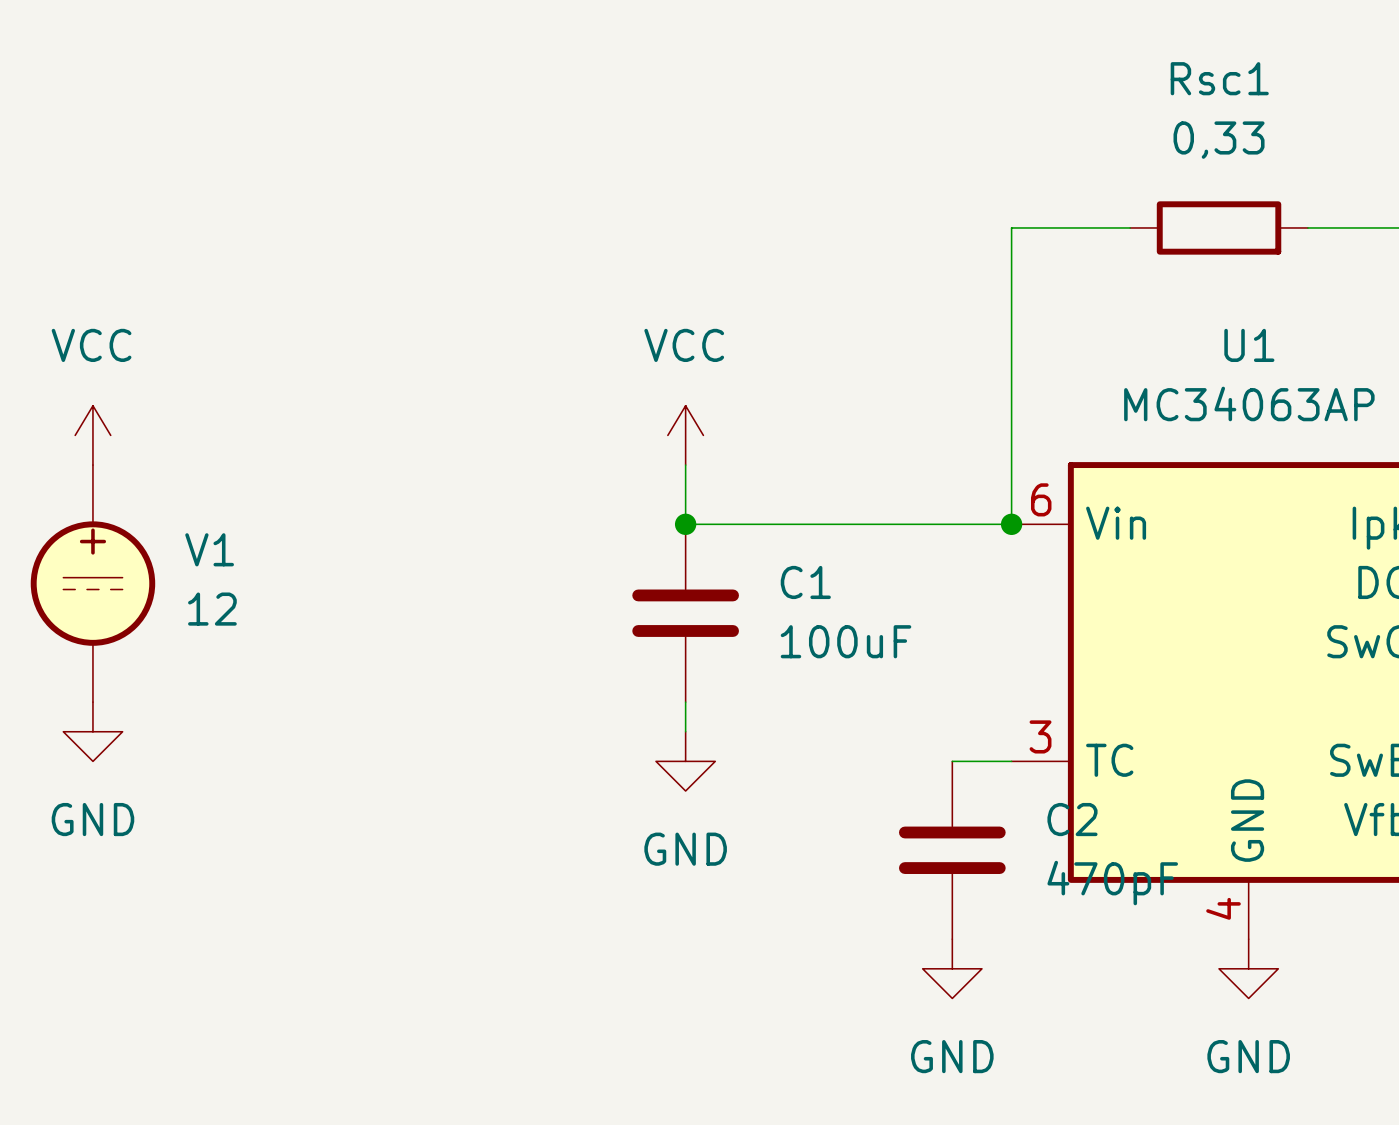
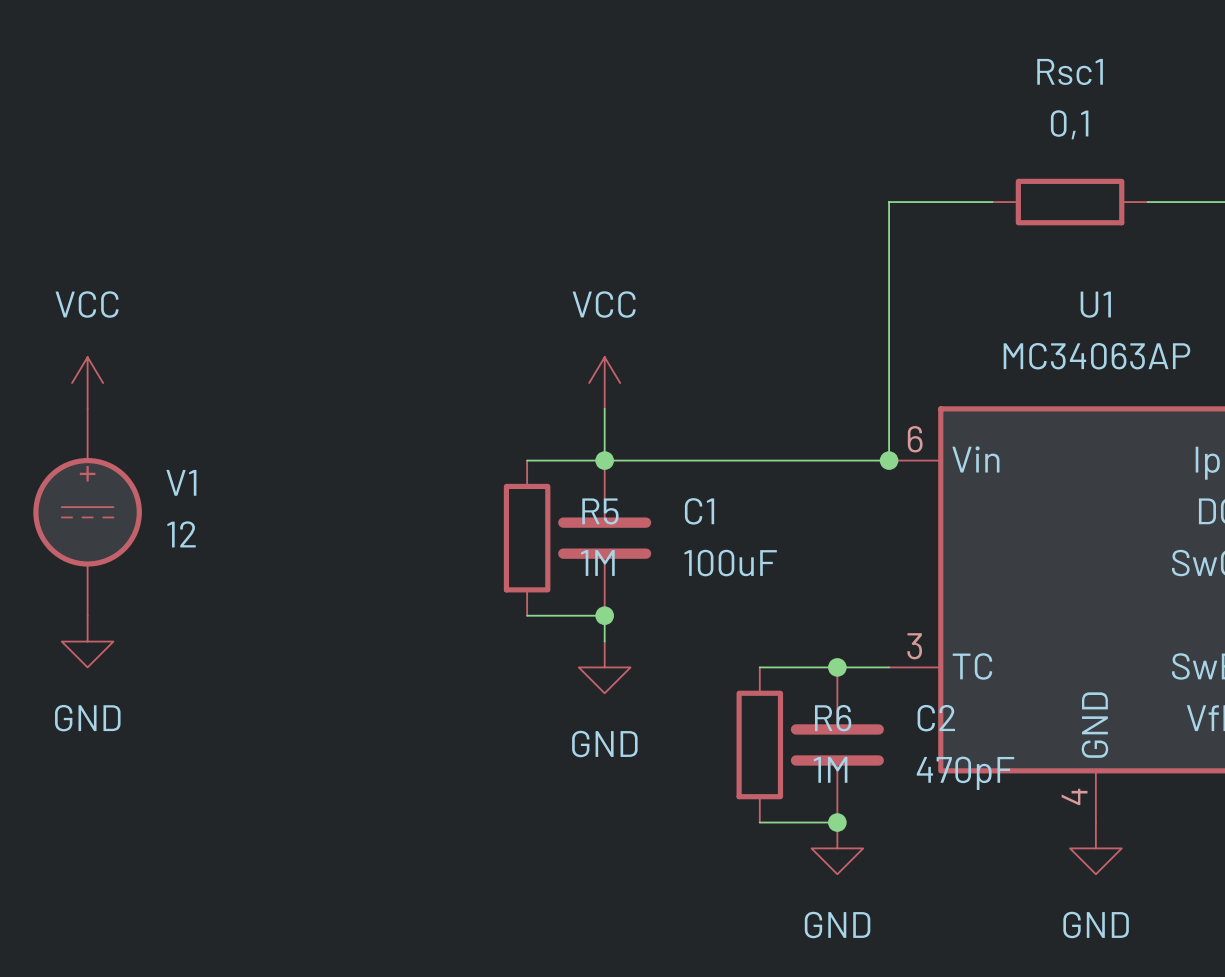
Rsc1 value: 0,33 (1219, 140) -> 0,1 (1069, 124)
wire: none -> (527, 460) (604, 460)
R5: none -> 1M (527, 538)
wire: none -> (527, 615) (604, 615)
junction: none -> (604, 615)
wire: none -> (759, 667) (837, 667)
junction: none -> (837, 667)
R6: none -> 1M (759, 744)
wire: none -> (759, 822) (837, 822)
junction: none -> (837, 822)

